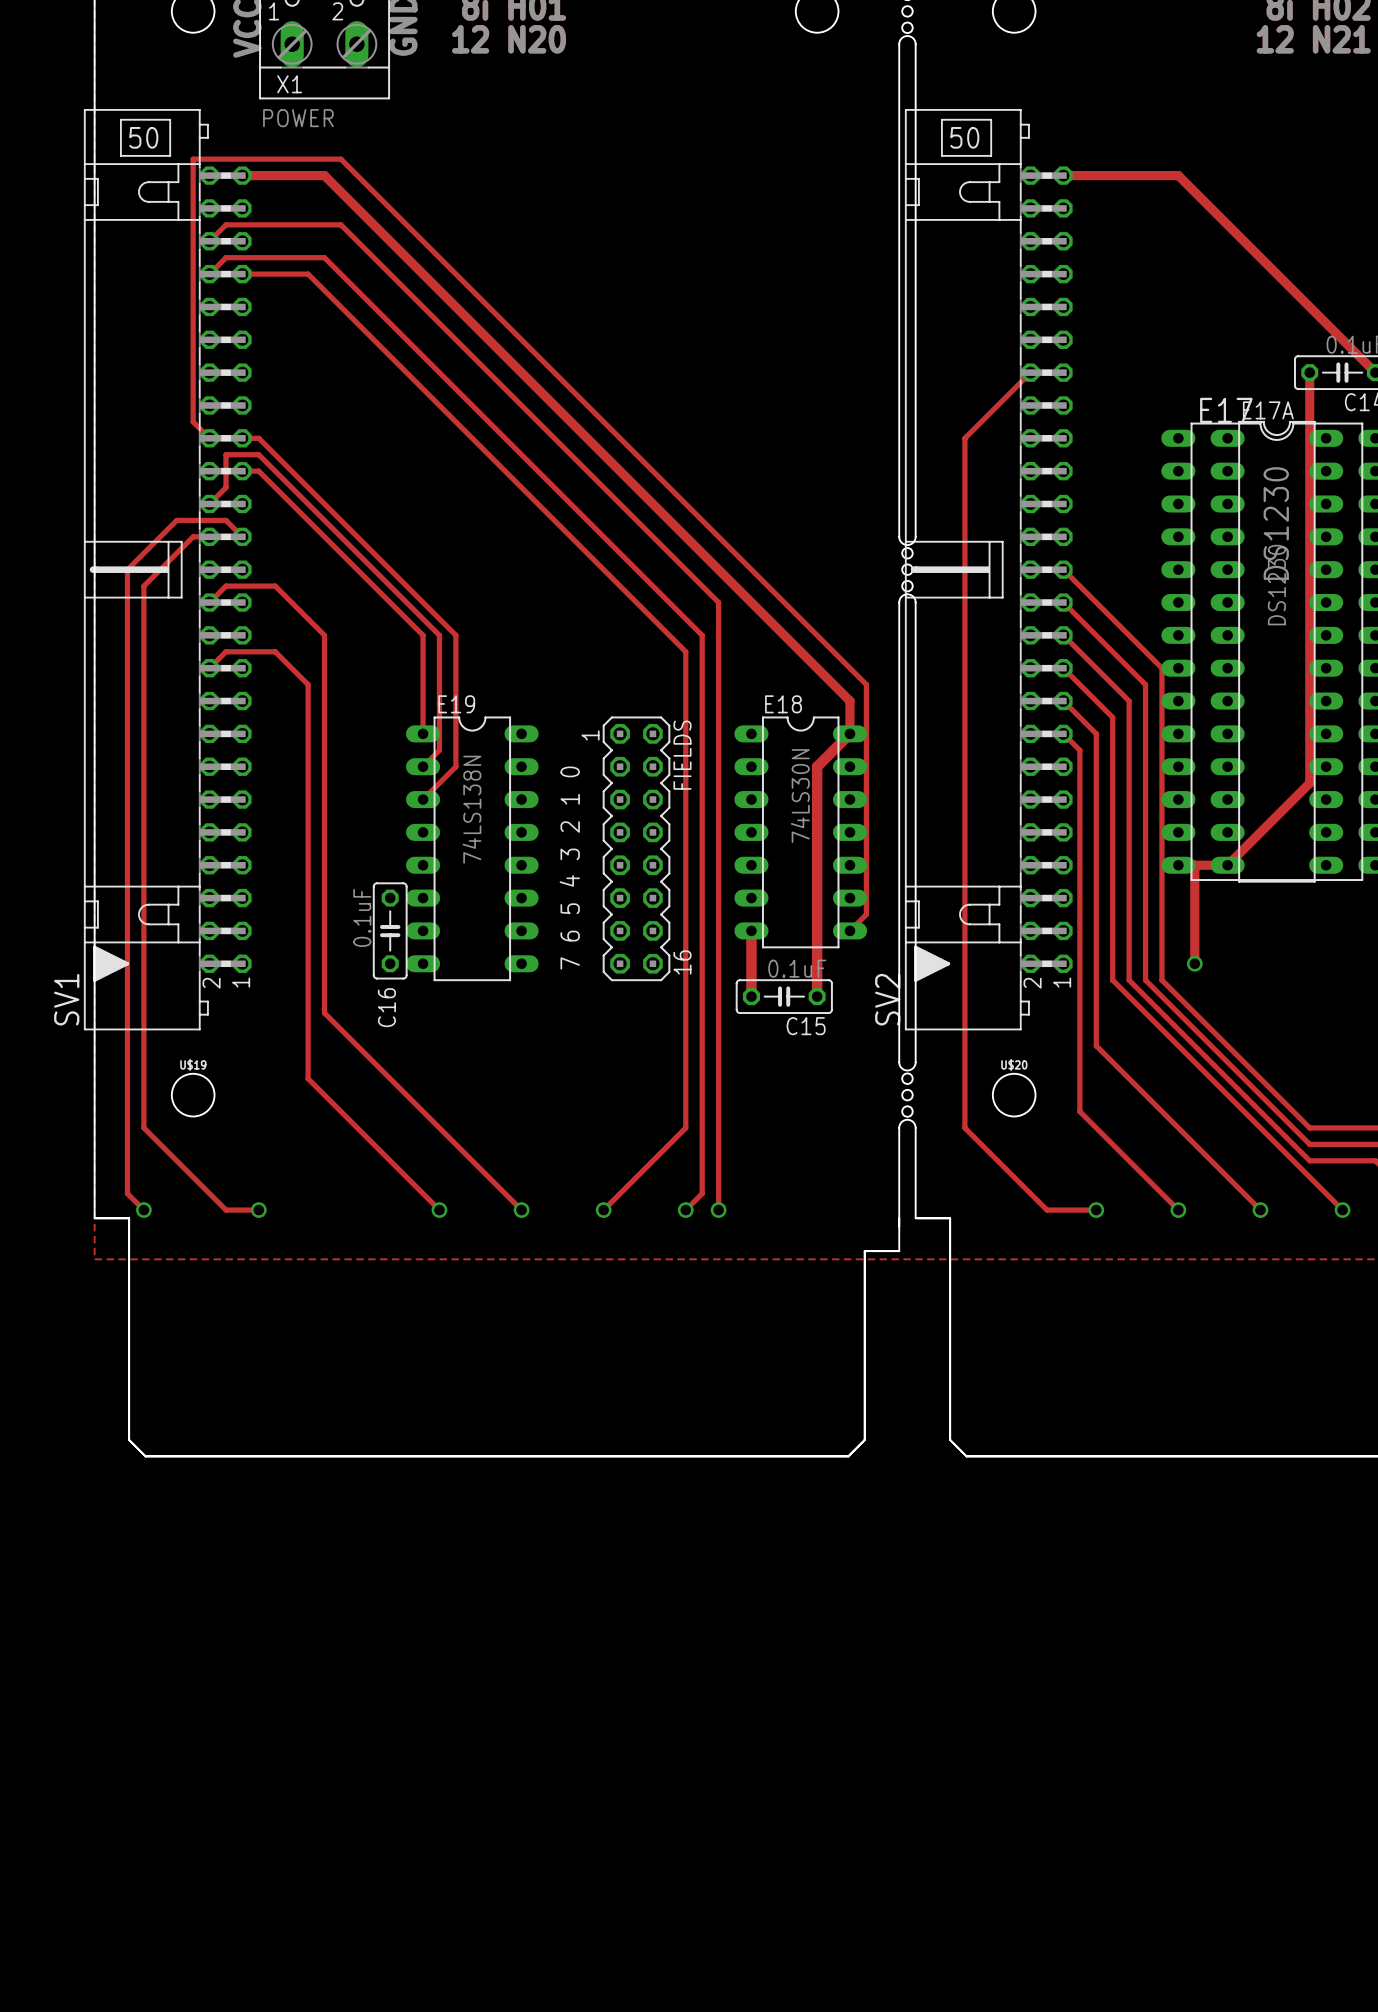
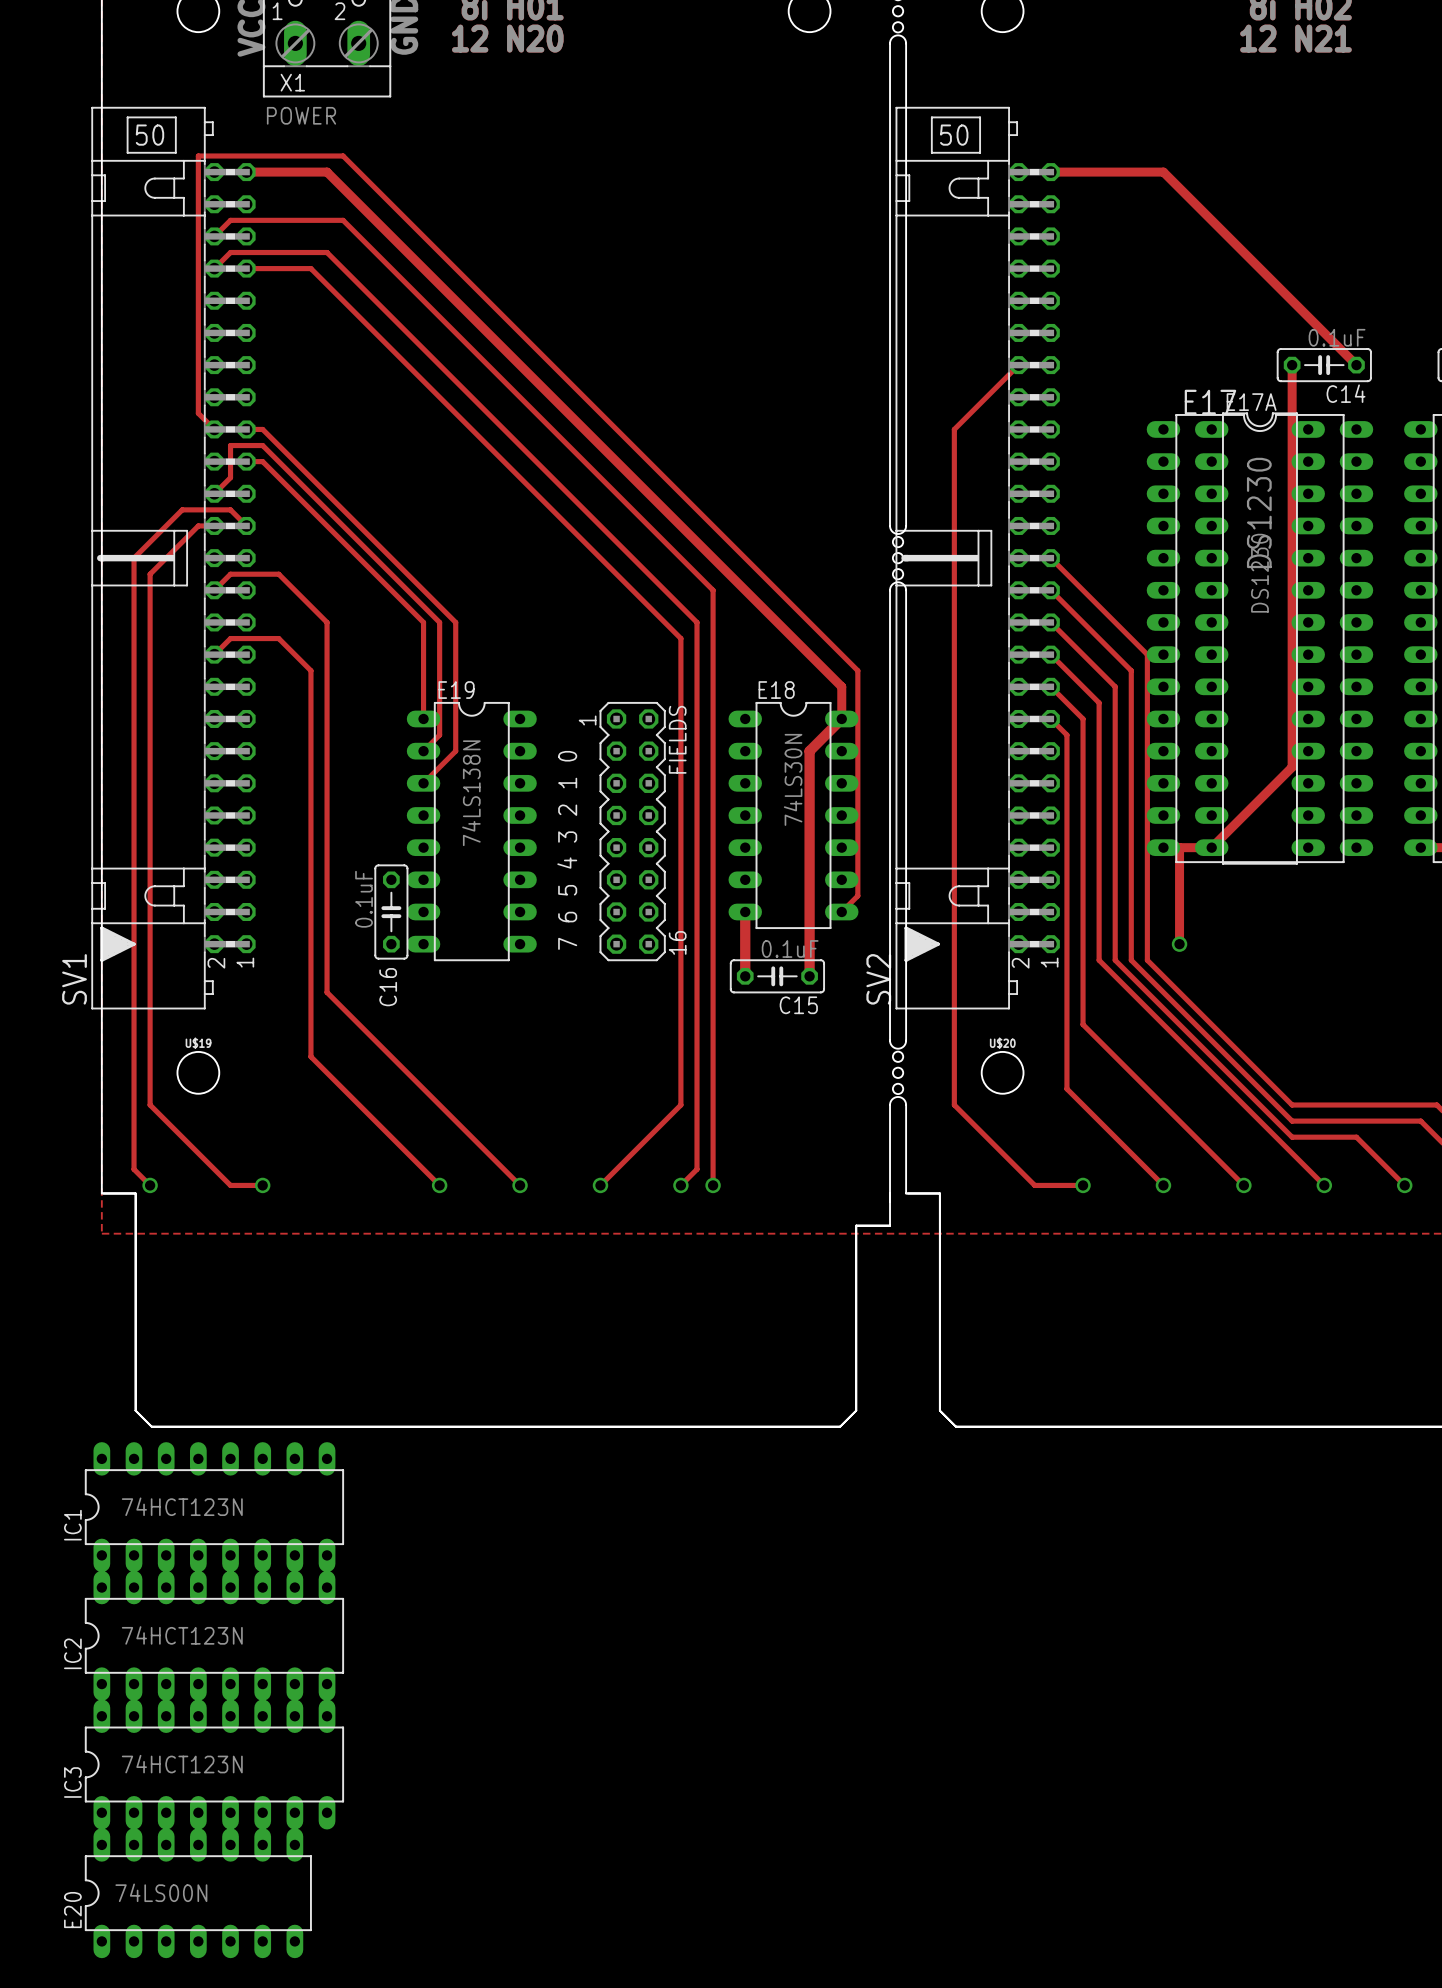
IC1: none -> 74HCT123N (214, 1507)
IC2: none -> 74HCT123N (214, 1635)
IC3: none -> 74HCT123N (214, 1764)
E20: none -> 74LS00N (198, 1893)

